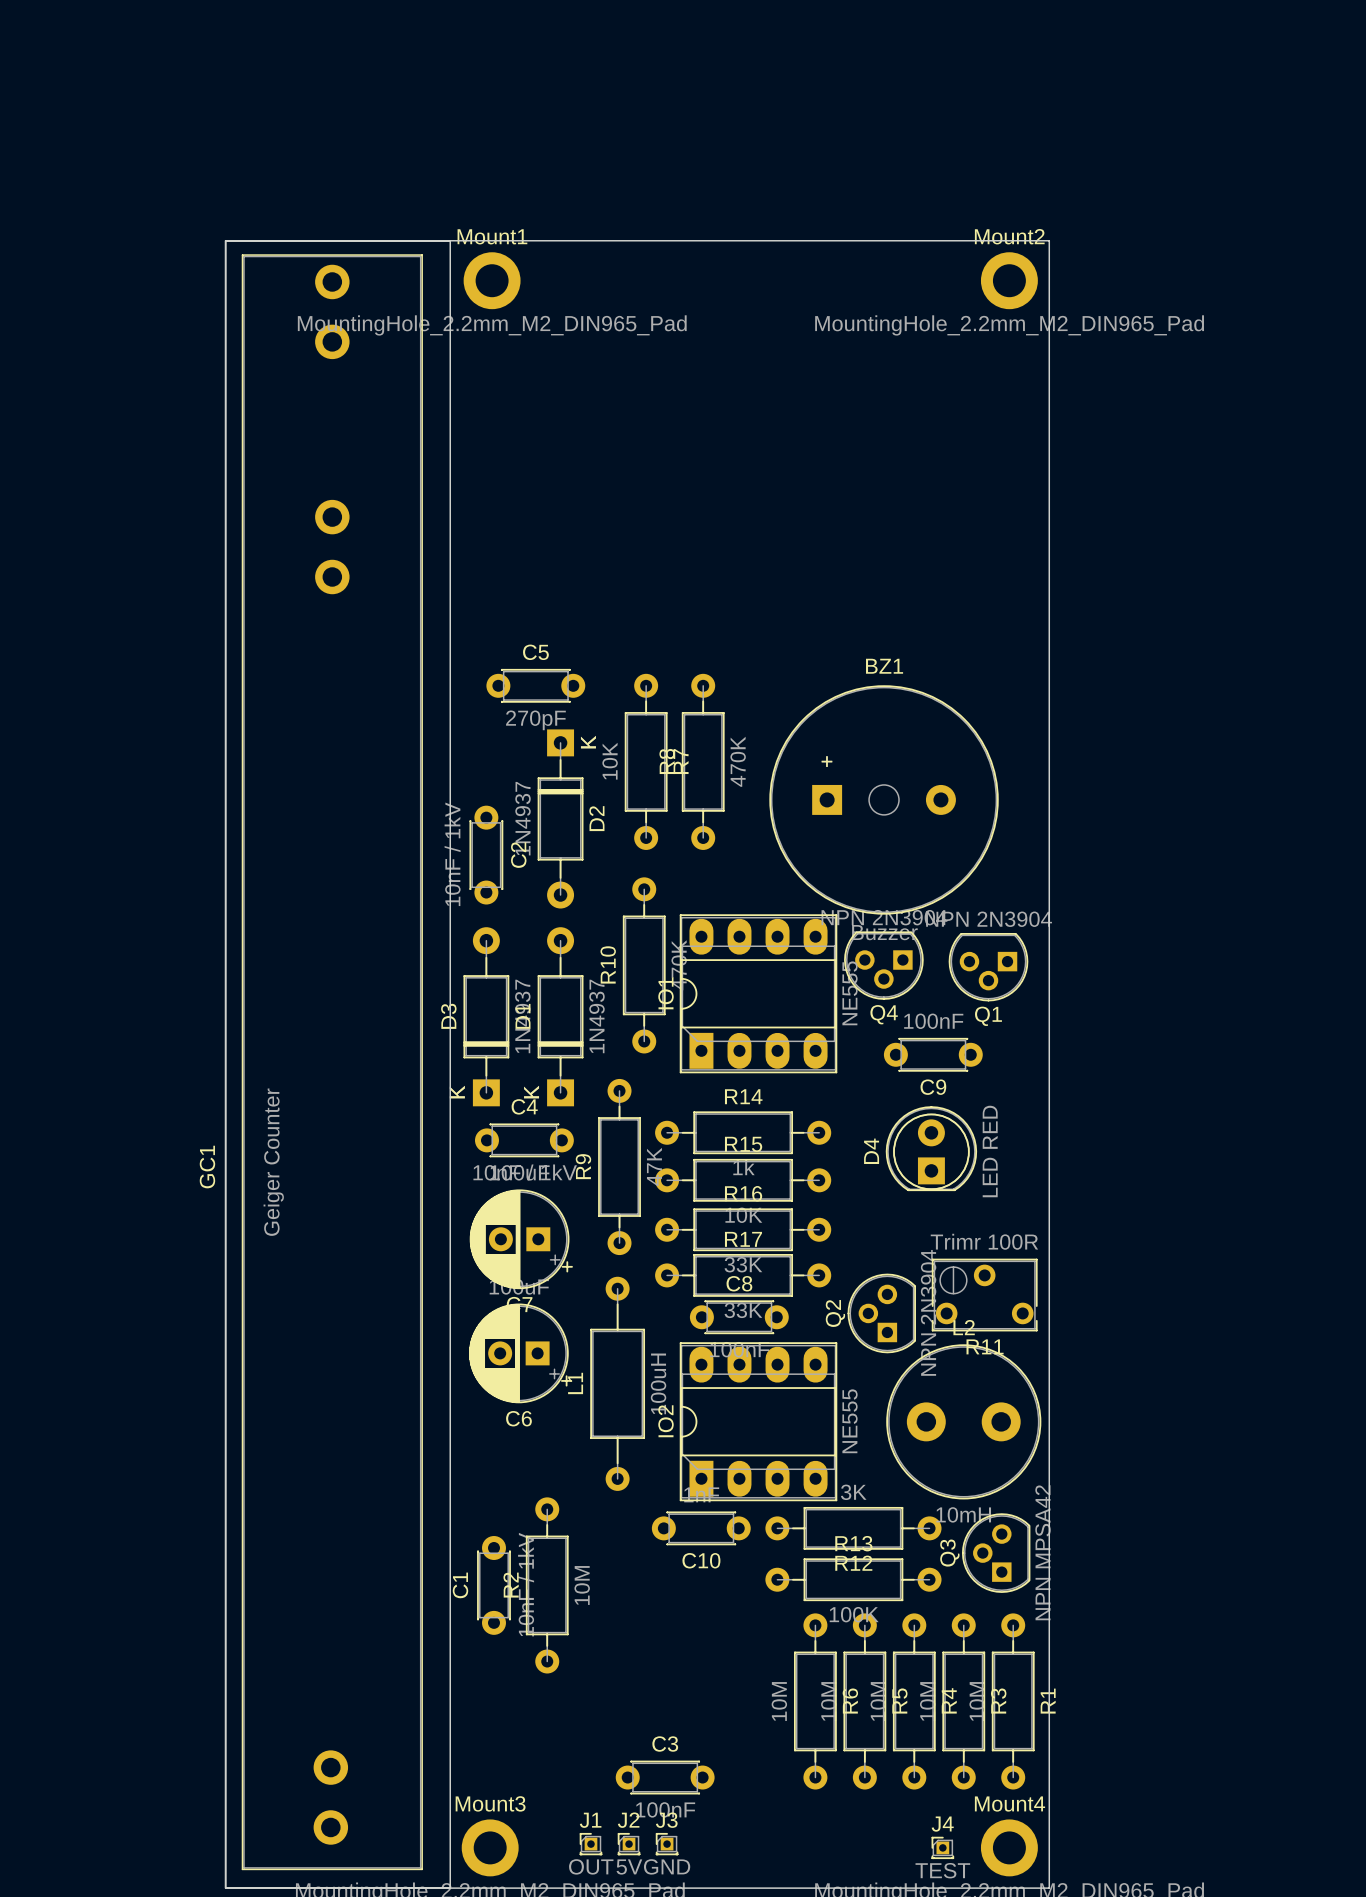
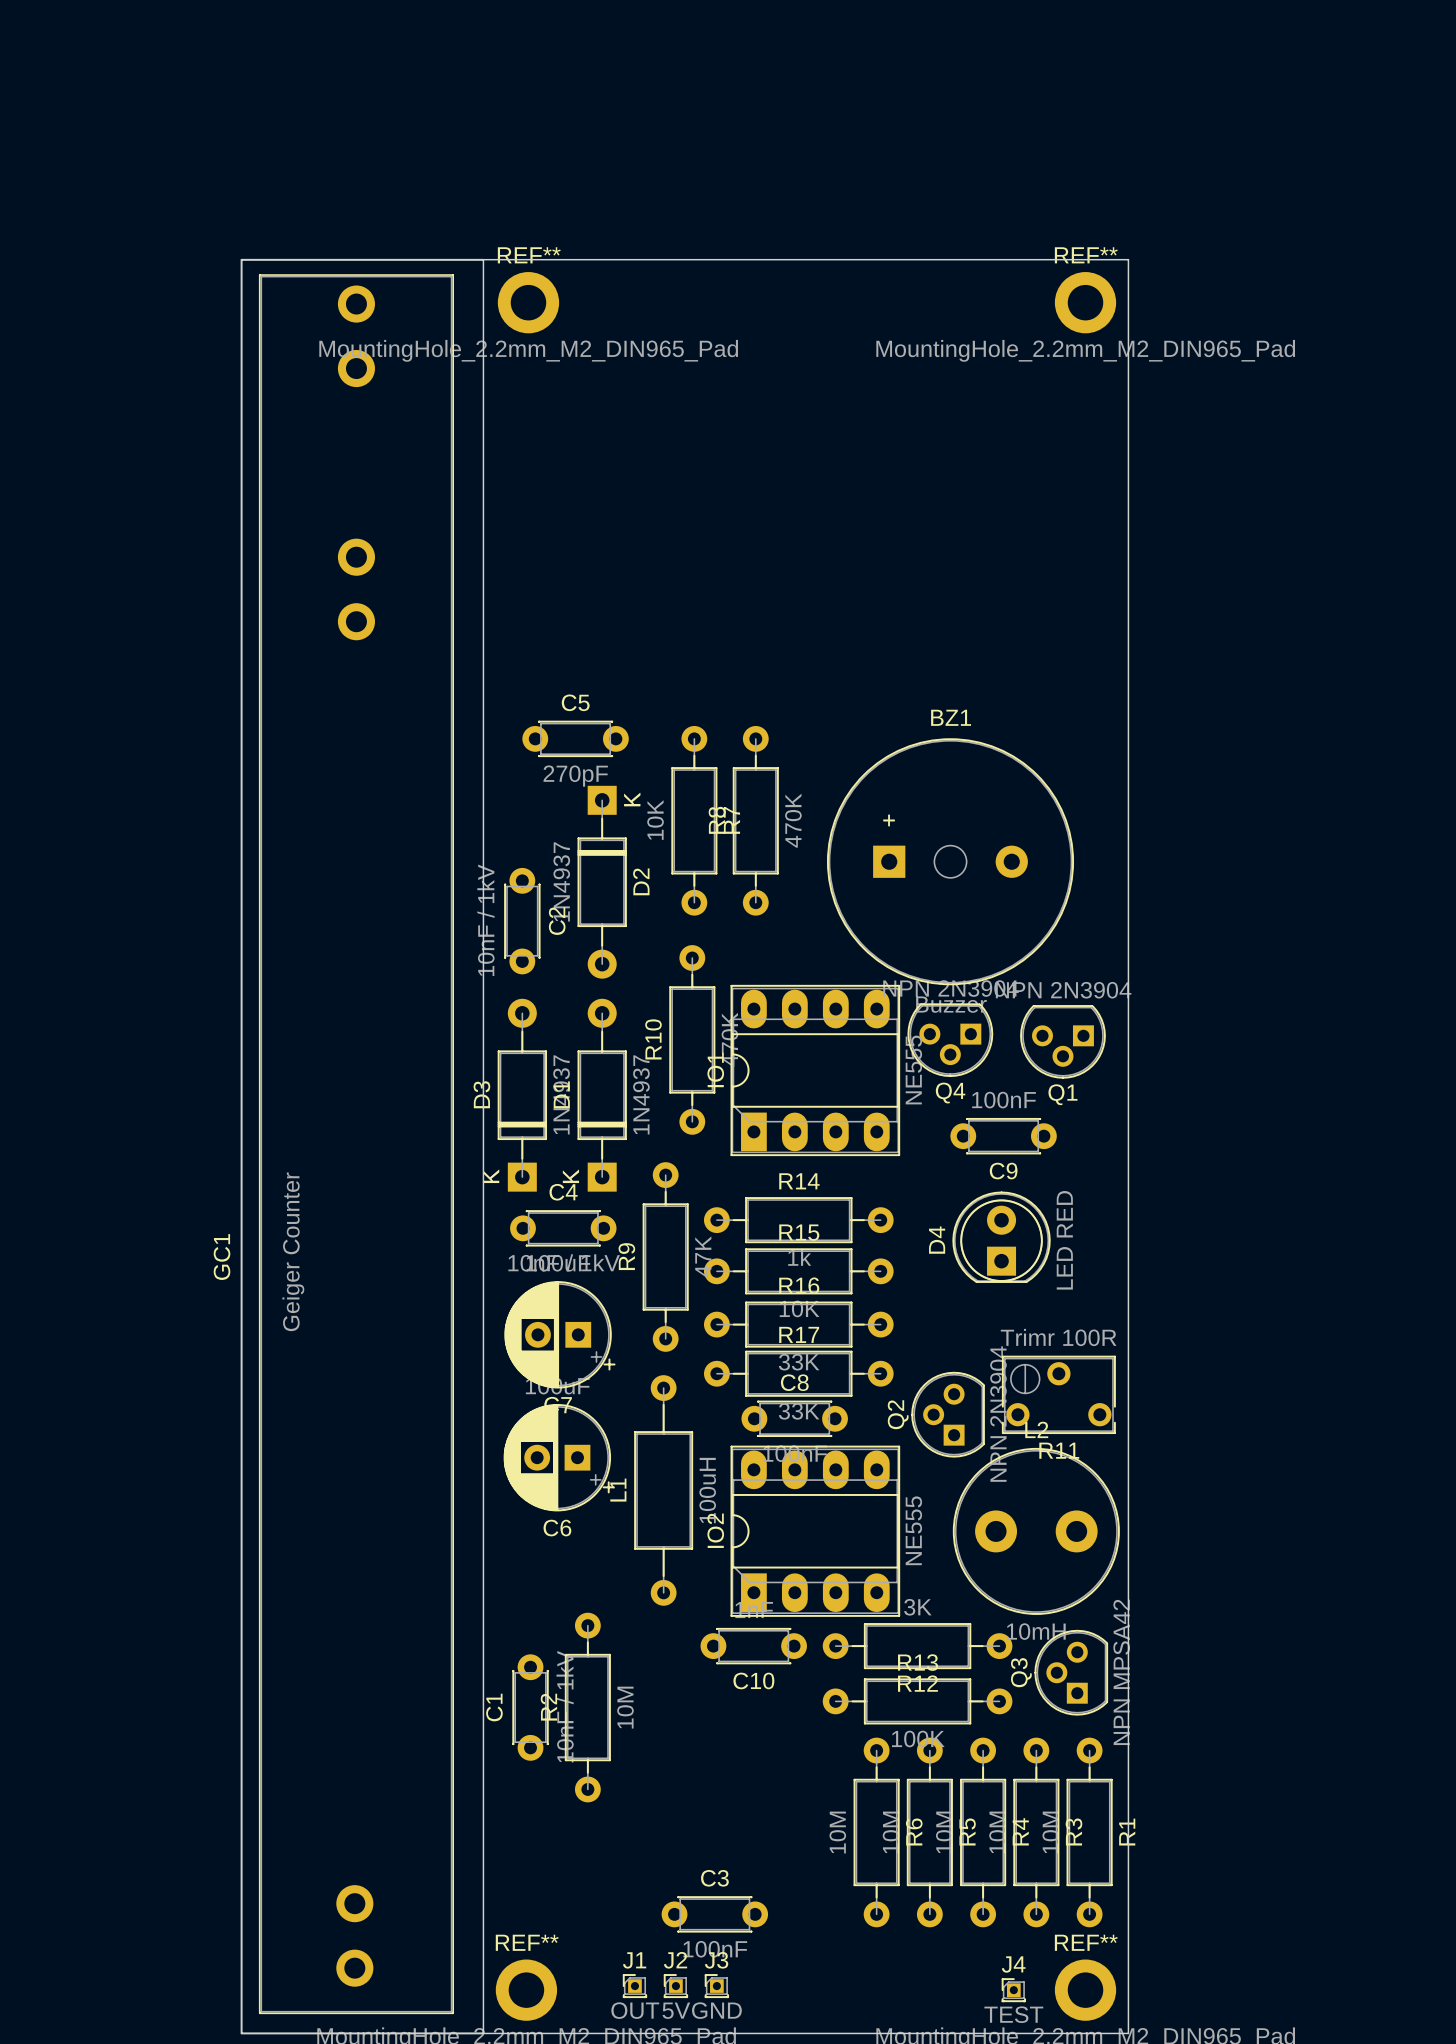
Mount1 name: Mount1 (492, 236) -> REF** (529, 255)
Mount2 name: Mount2 (1009, 236) -> REF** (1086, 255)
Mount3 name: Mount3 (490, 1803) -> REF** (527, 1942)
Mount4 name: Mount4 (1009, 1804) -> REF** (1086, 1942)

